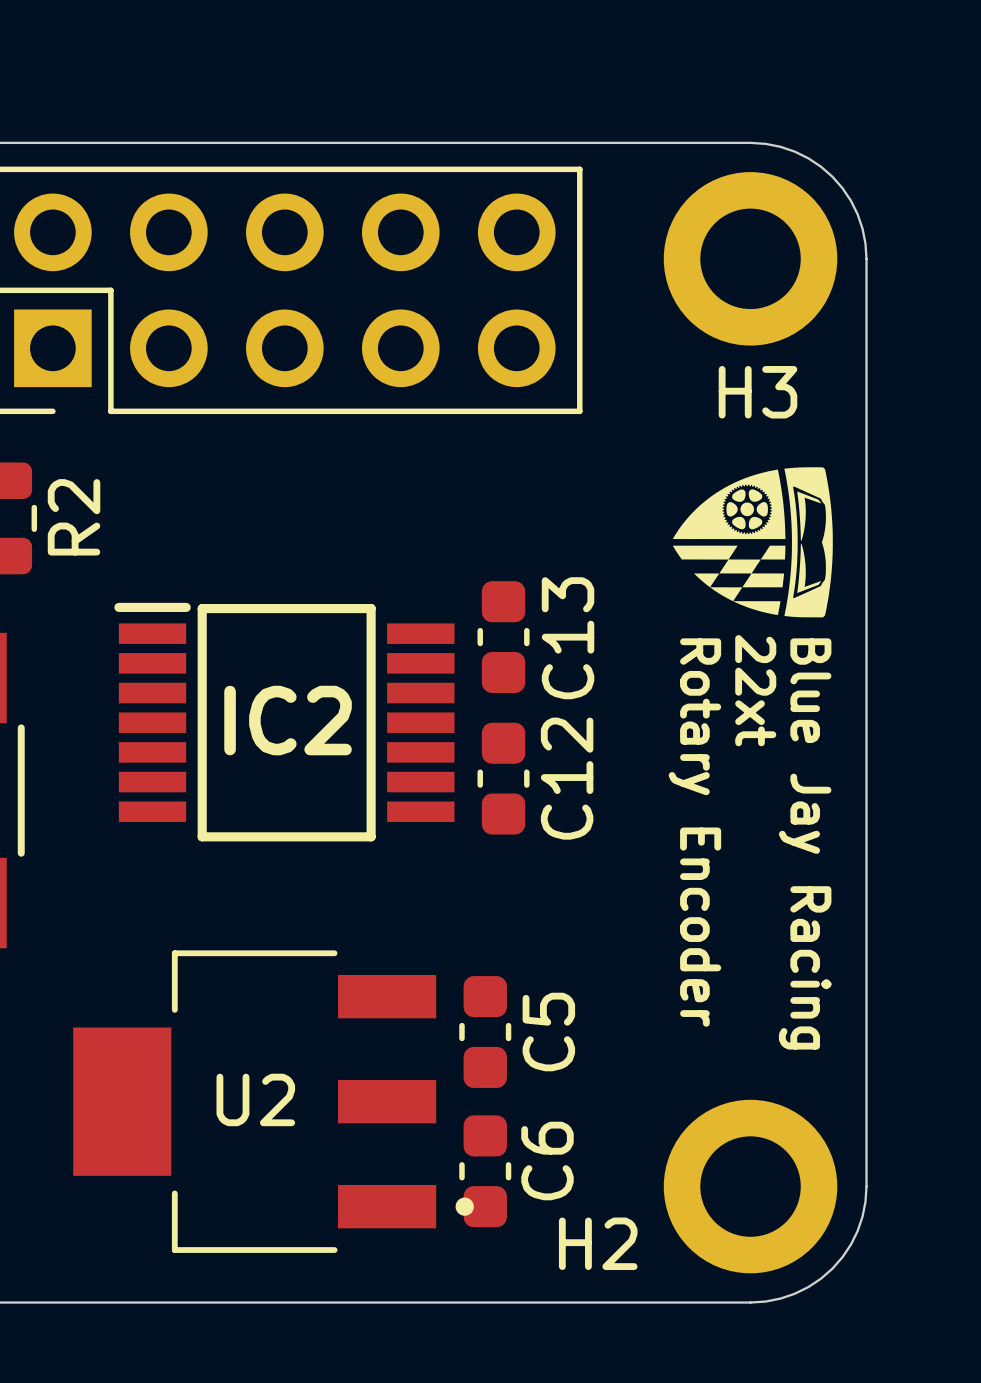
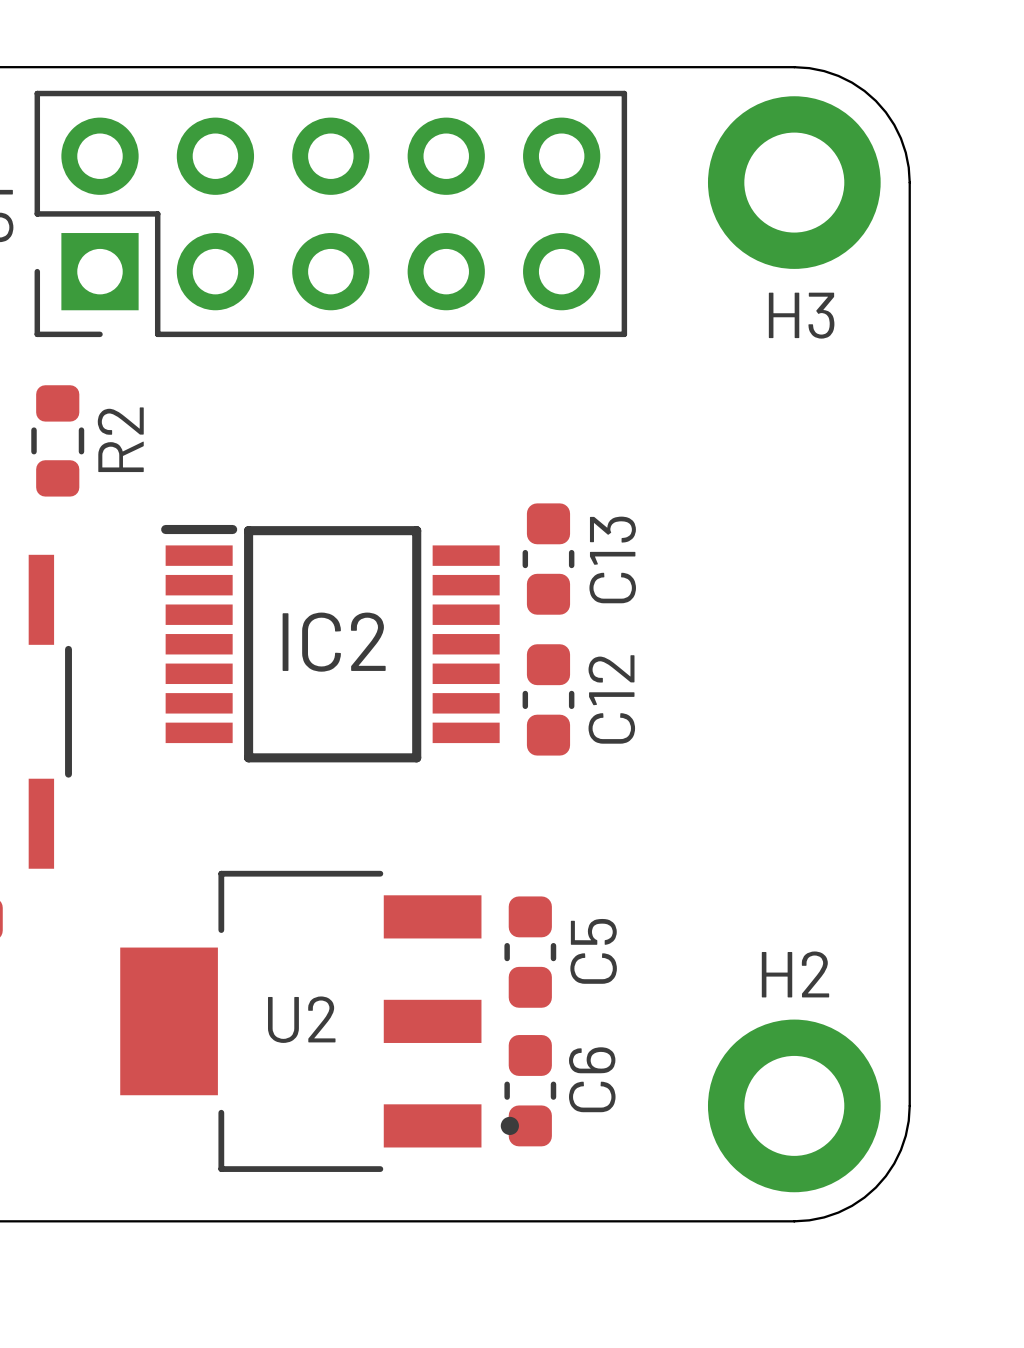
drawing: [672, 467, 833, 618] -> none
text: 22xt (755, 690) -> none
text: Rotary Encoder (694, 832) -> none
text: Blue Jay Racing (805, 843) -> none
H2 name position: H2 (598, 1243) -> H2 (795, 974)

